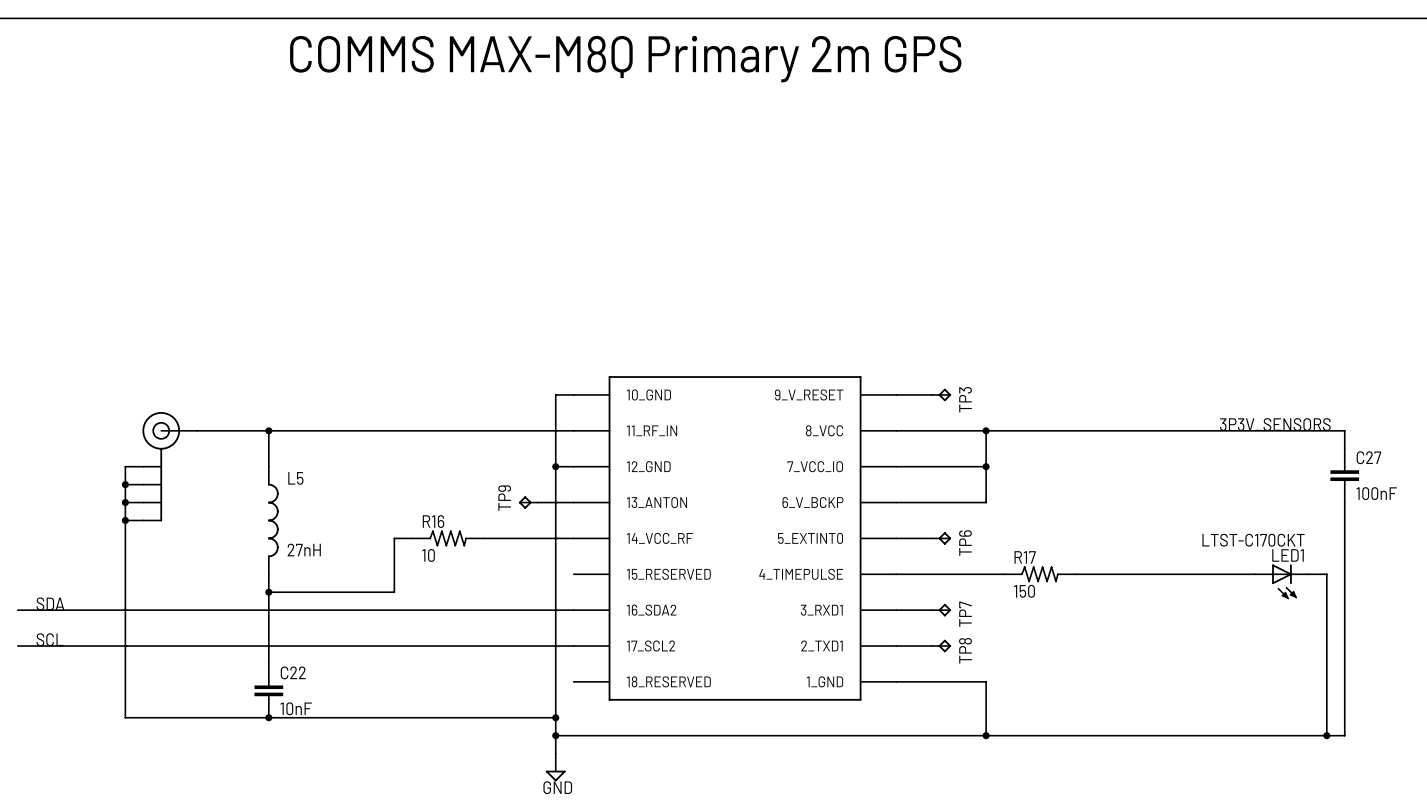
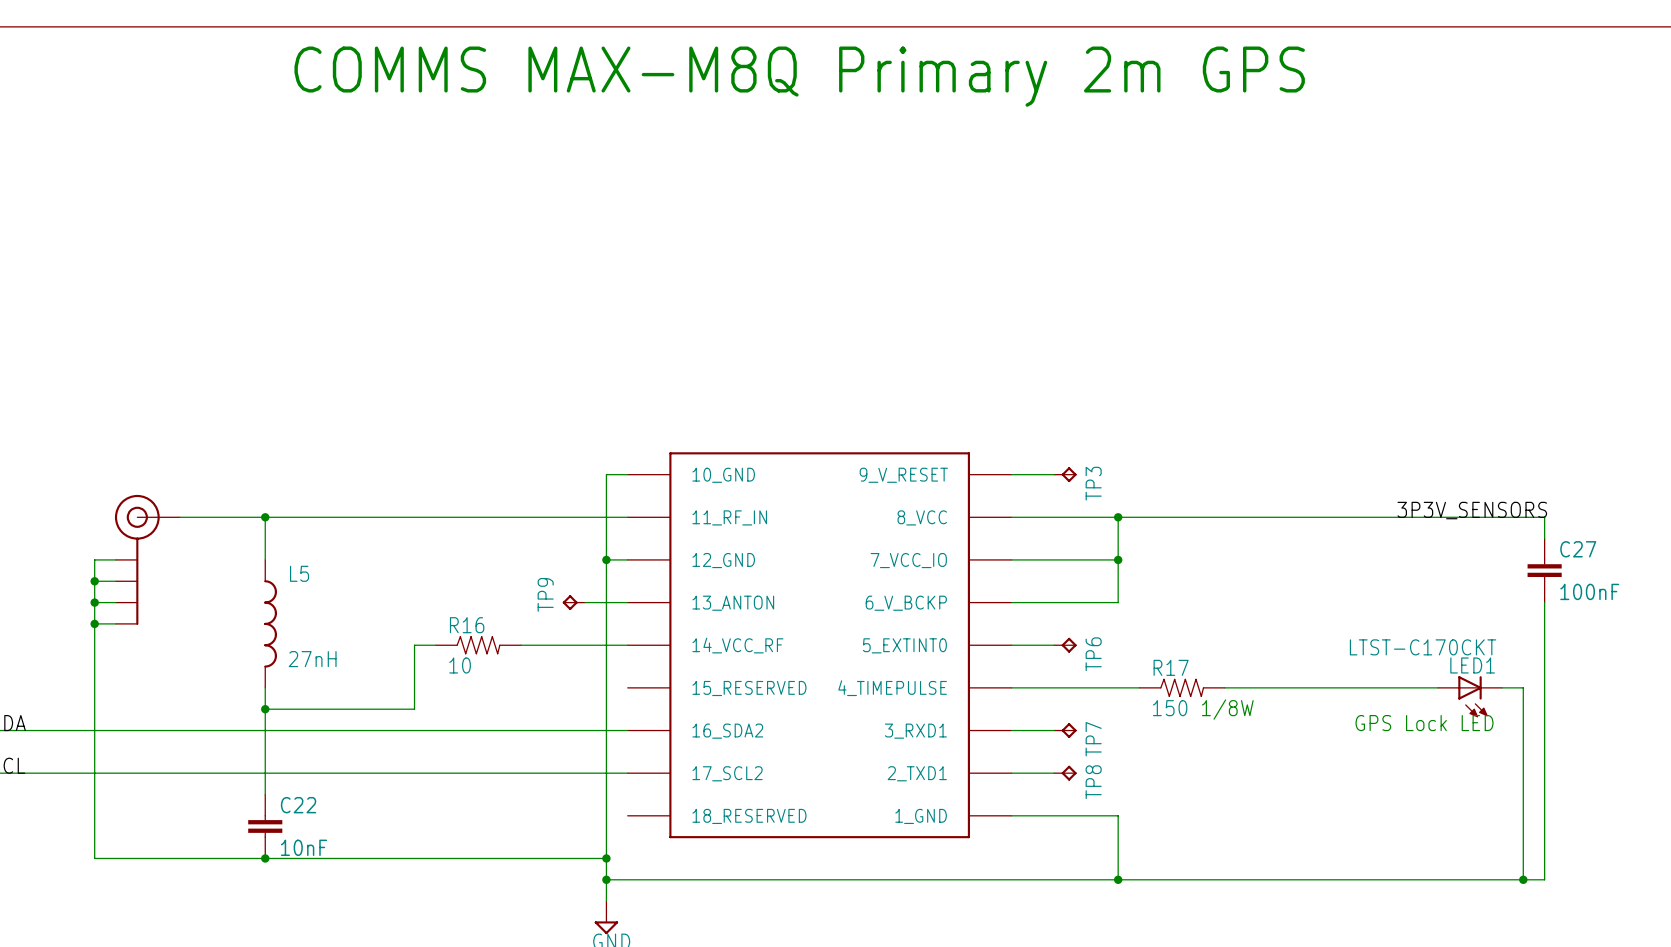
text: none -> 1/8W (1227, 709)
text: none -> GPS Lock LED (1424, 723)

